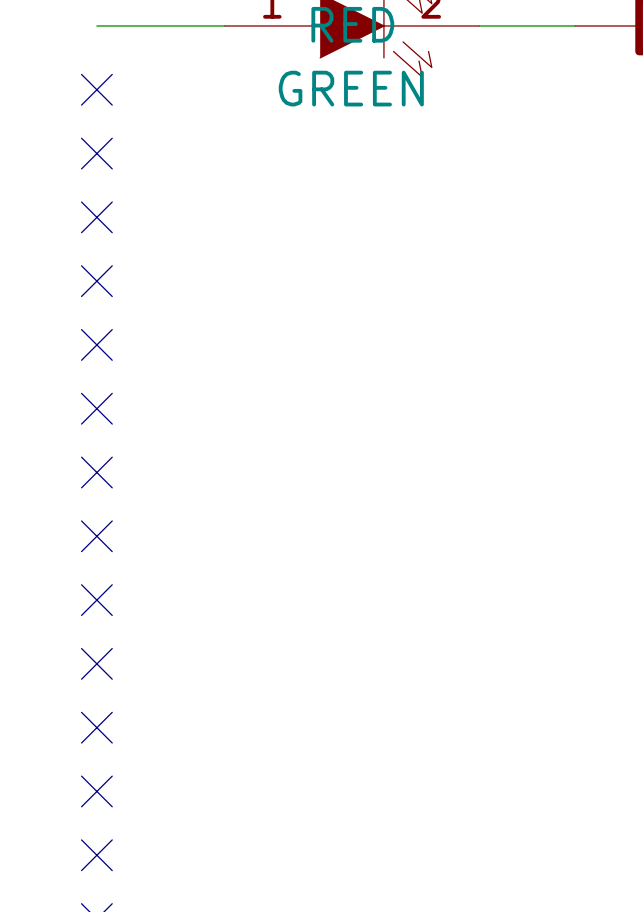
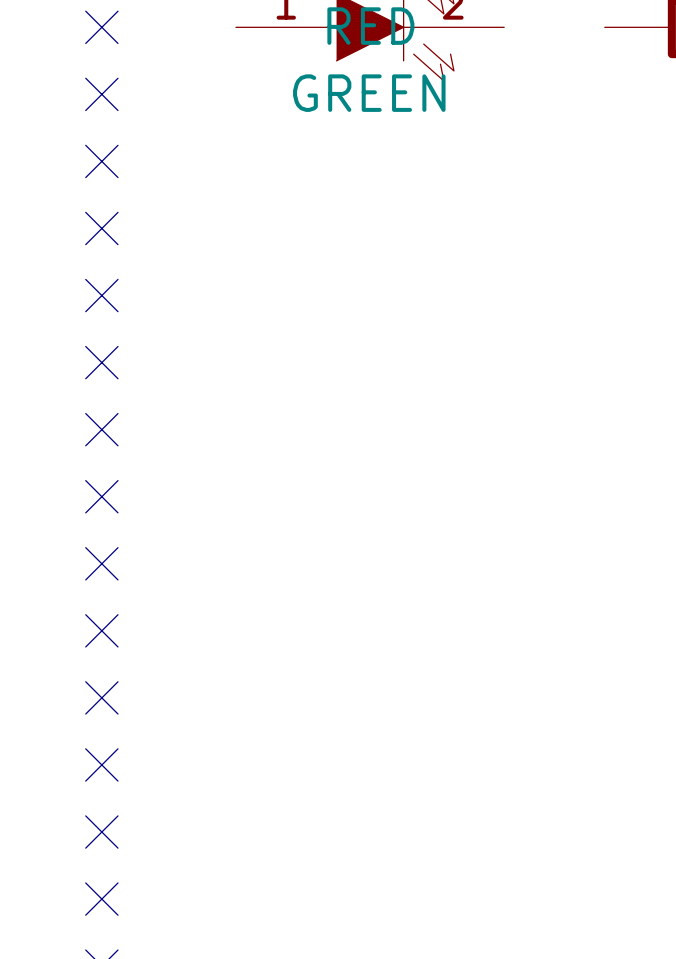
wire: (96, 25) (224, 25) -> none
no-connect mark: none -> (101, 27)
wire: (479, 25) (575, 25) -> none

